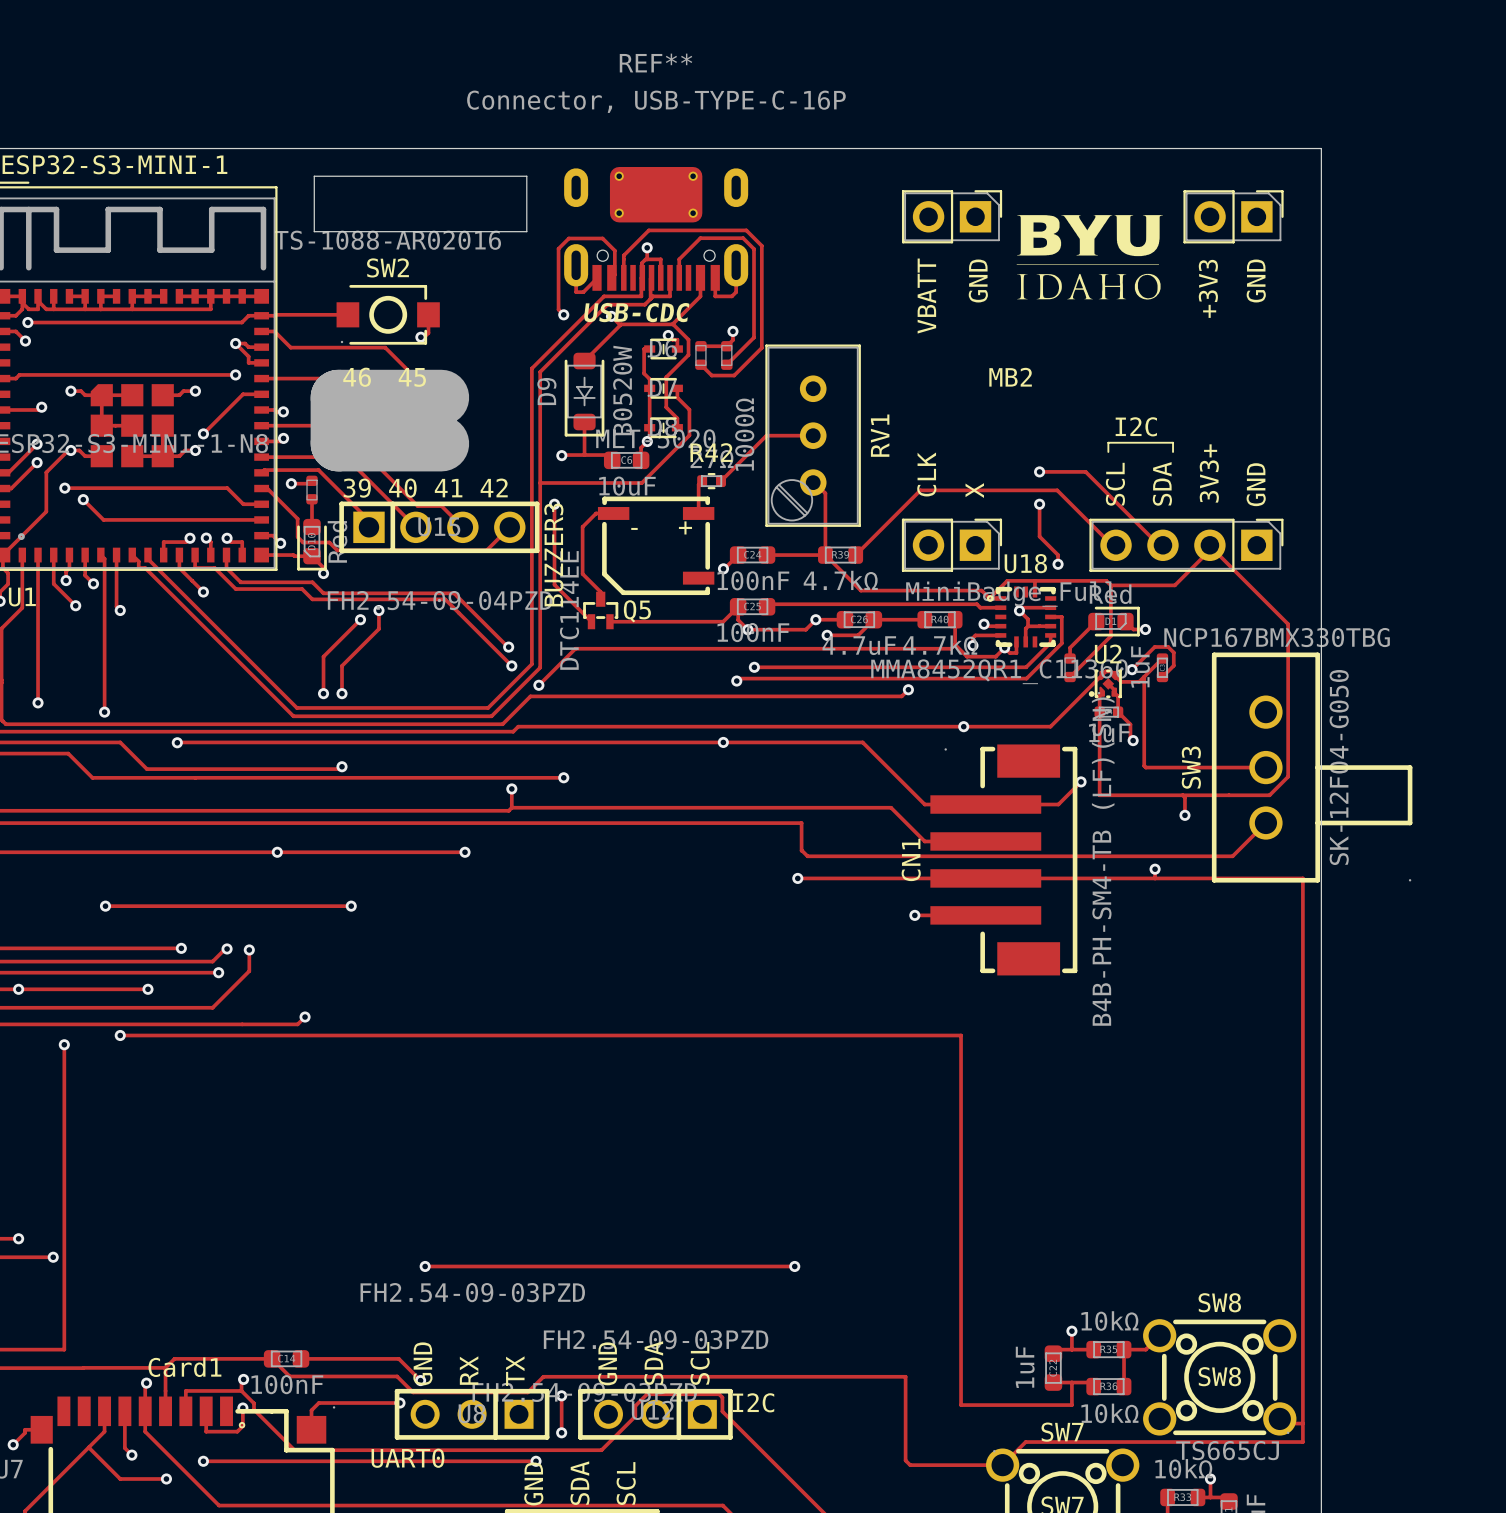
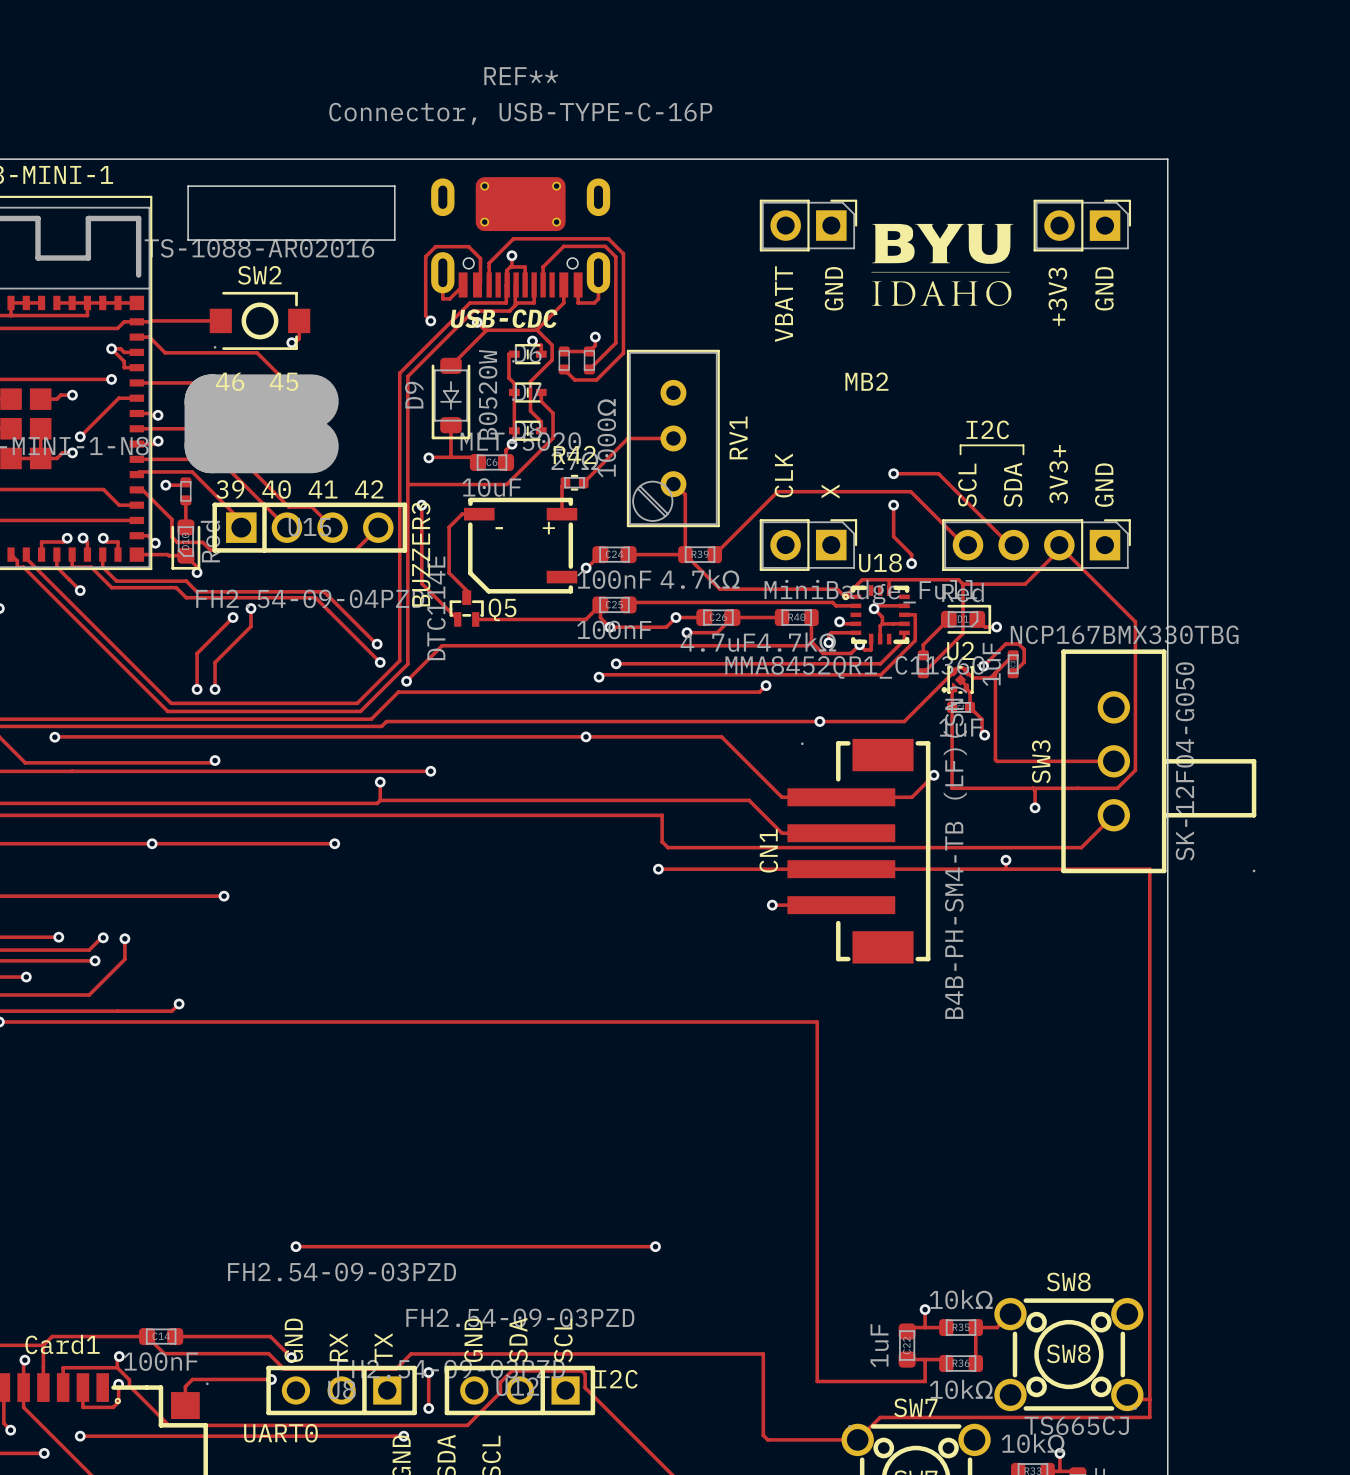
Q5 value: DTC114EE (569, 610) -> DTC114E (436, 608)

